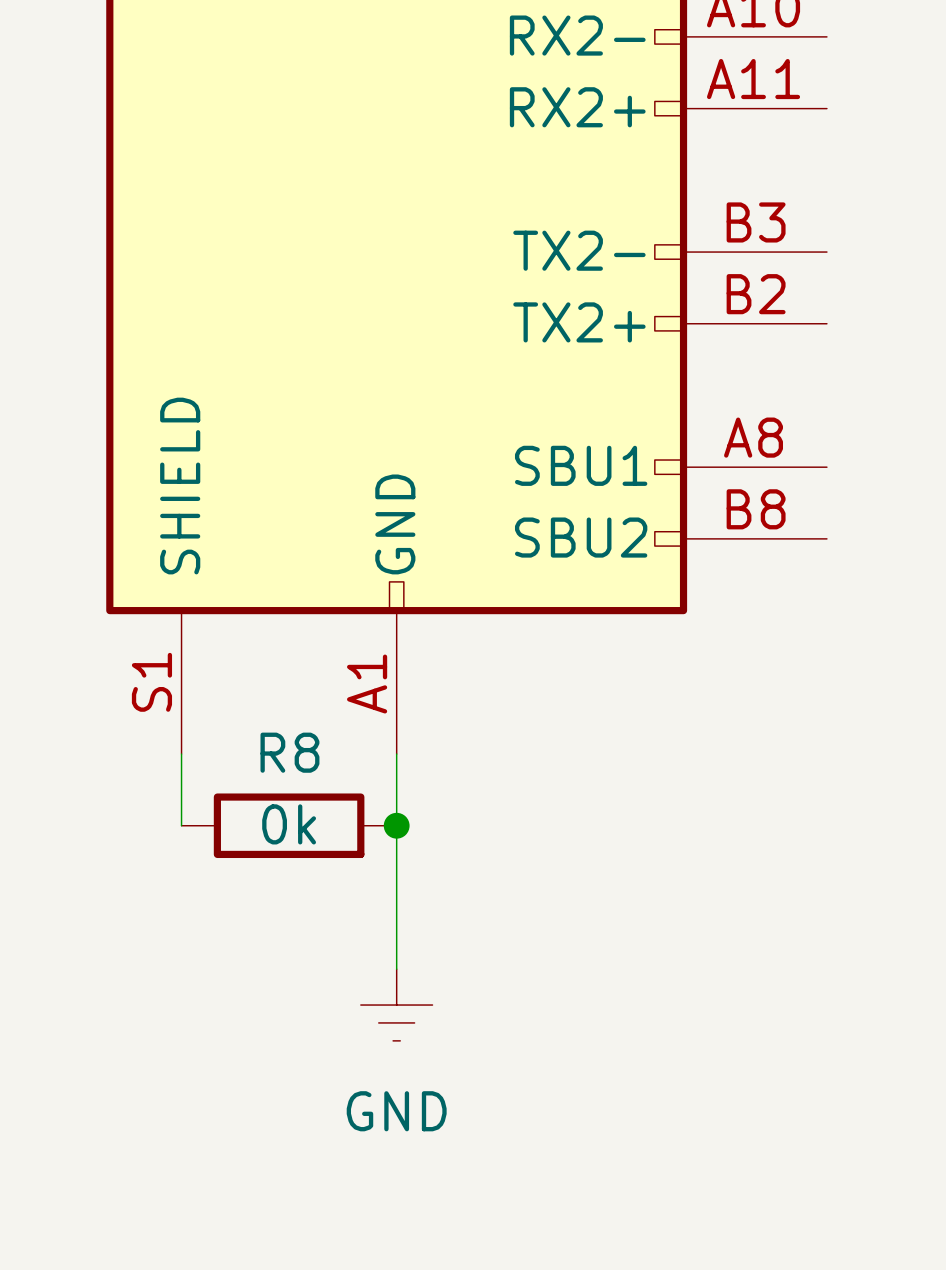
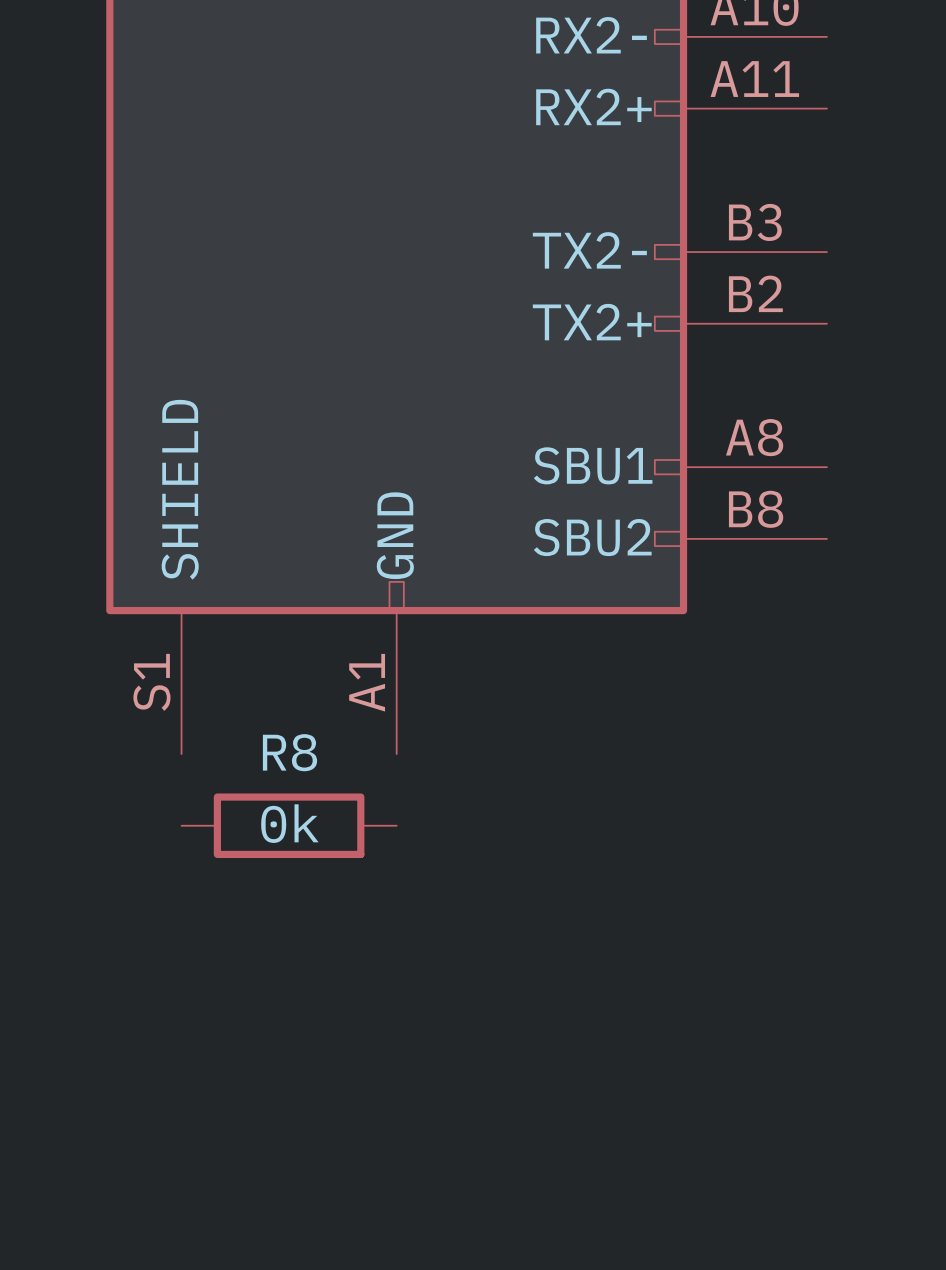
wire: (181, 754) (181, 825) -> none
wire: (396, 754) (396, 969) -> none
junction: (396, 825) -> none
power symbol: GND (396, 1005) -> none

